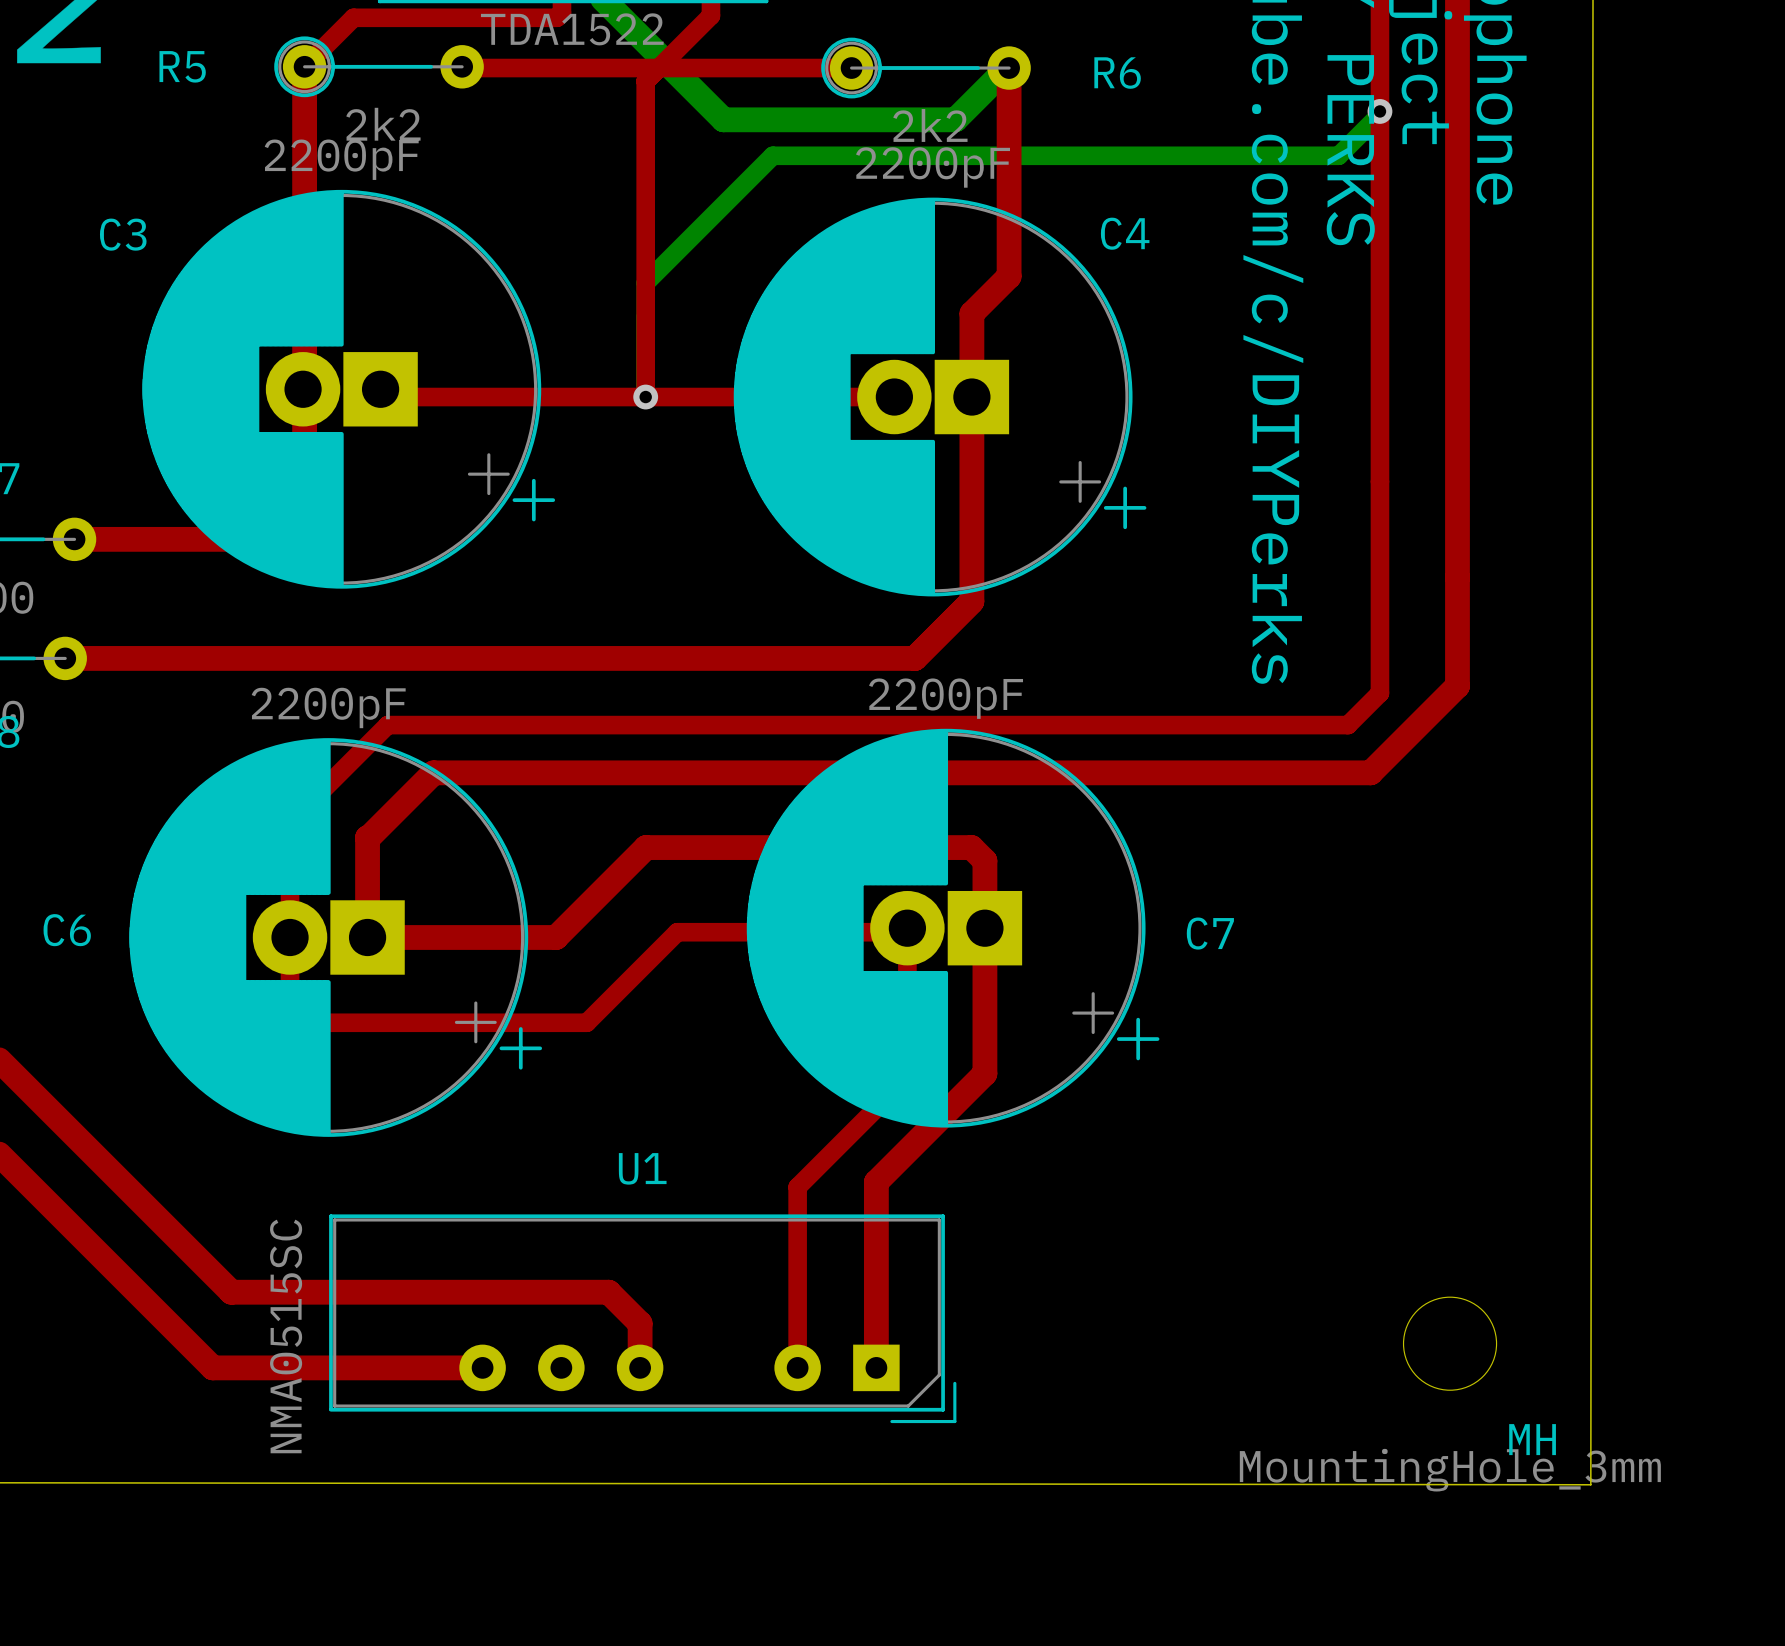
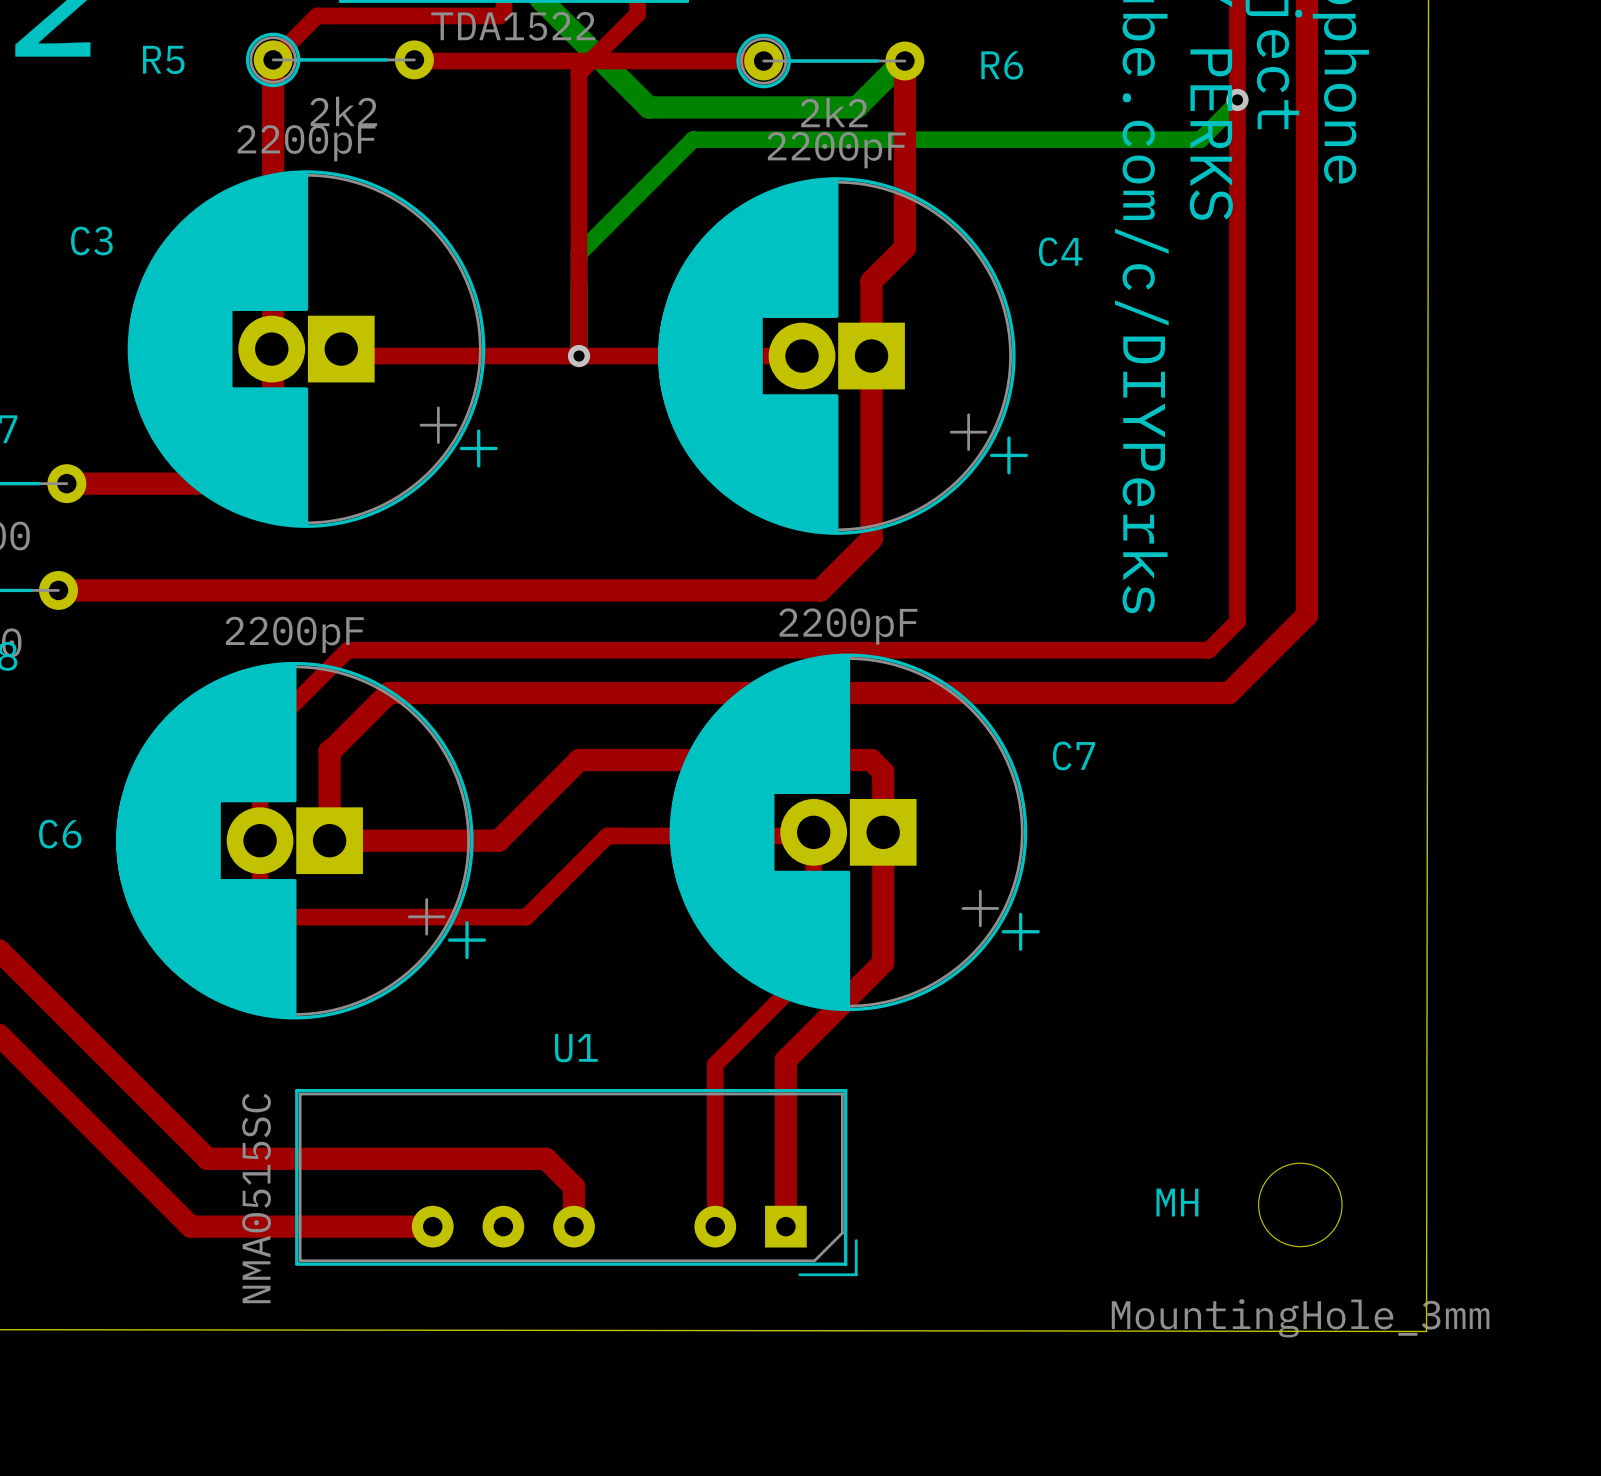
C4 name position: C4 (1125, 233) -> C4 (1060, 251)
C3 name position: C3 (123, 234) -> C3 (91, 240)
C7 name position: C7 (1210, 933) -> C7 (1073, 755)
MH name position: MH (1532, 1439) -> MH (1177, 1202)

